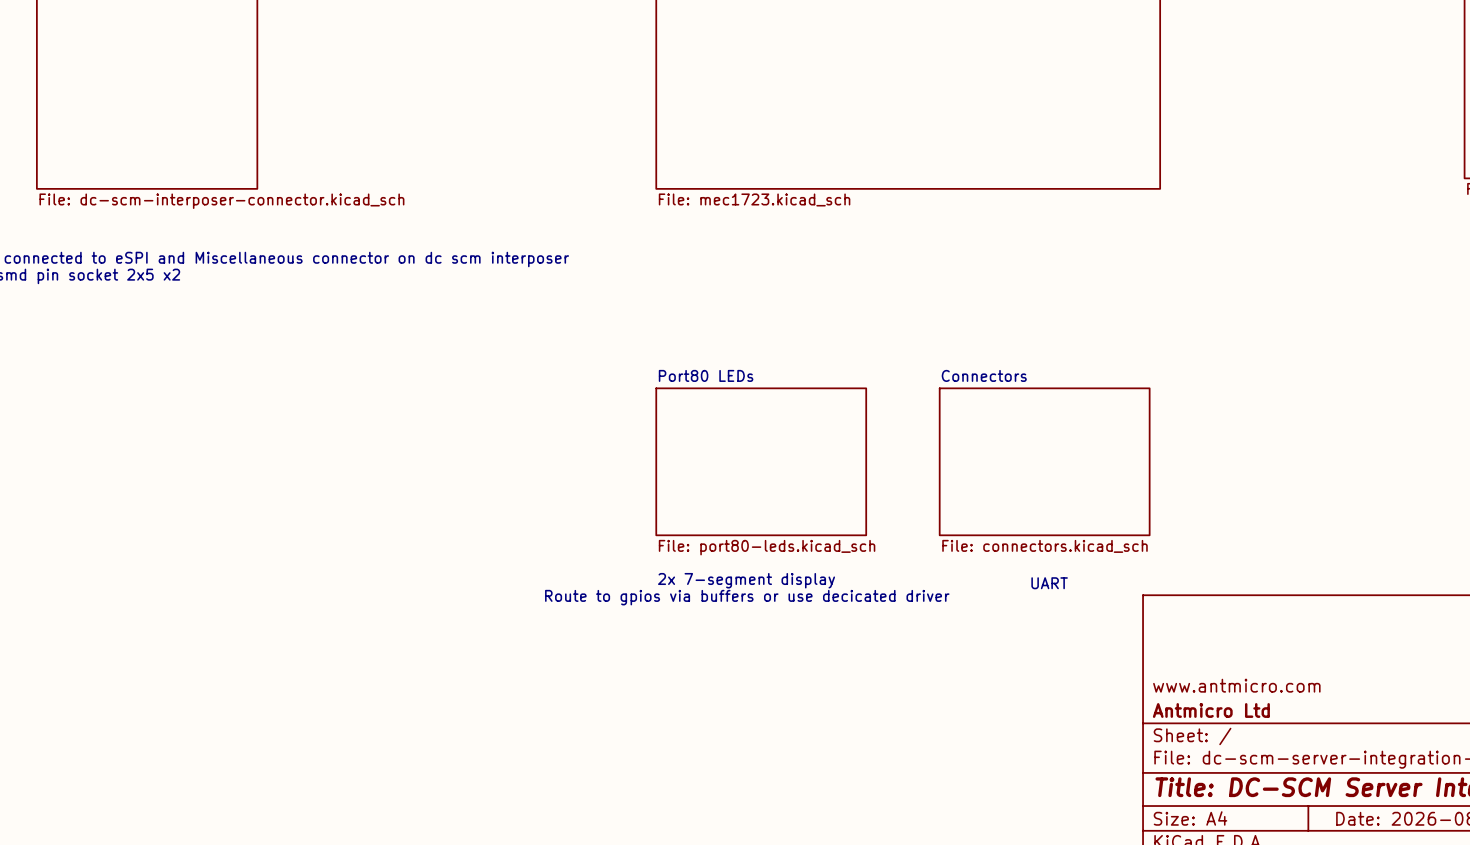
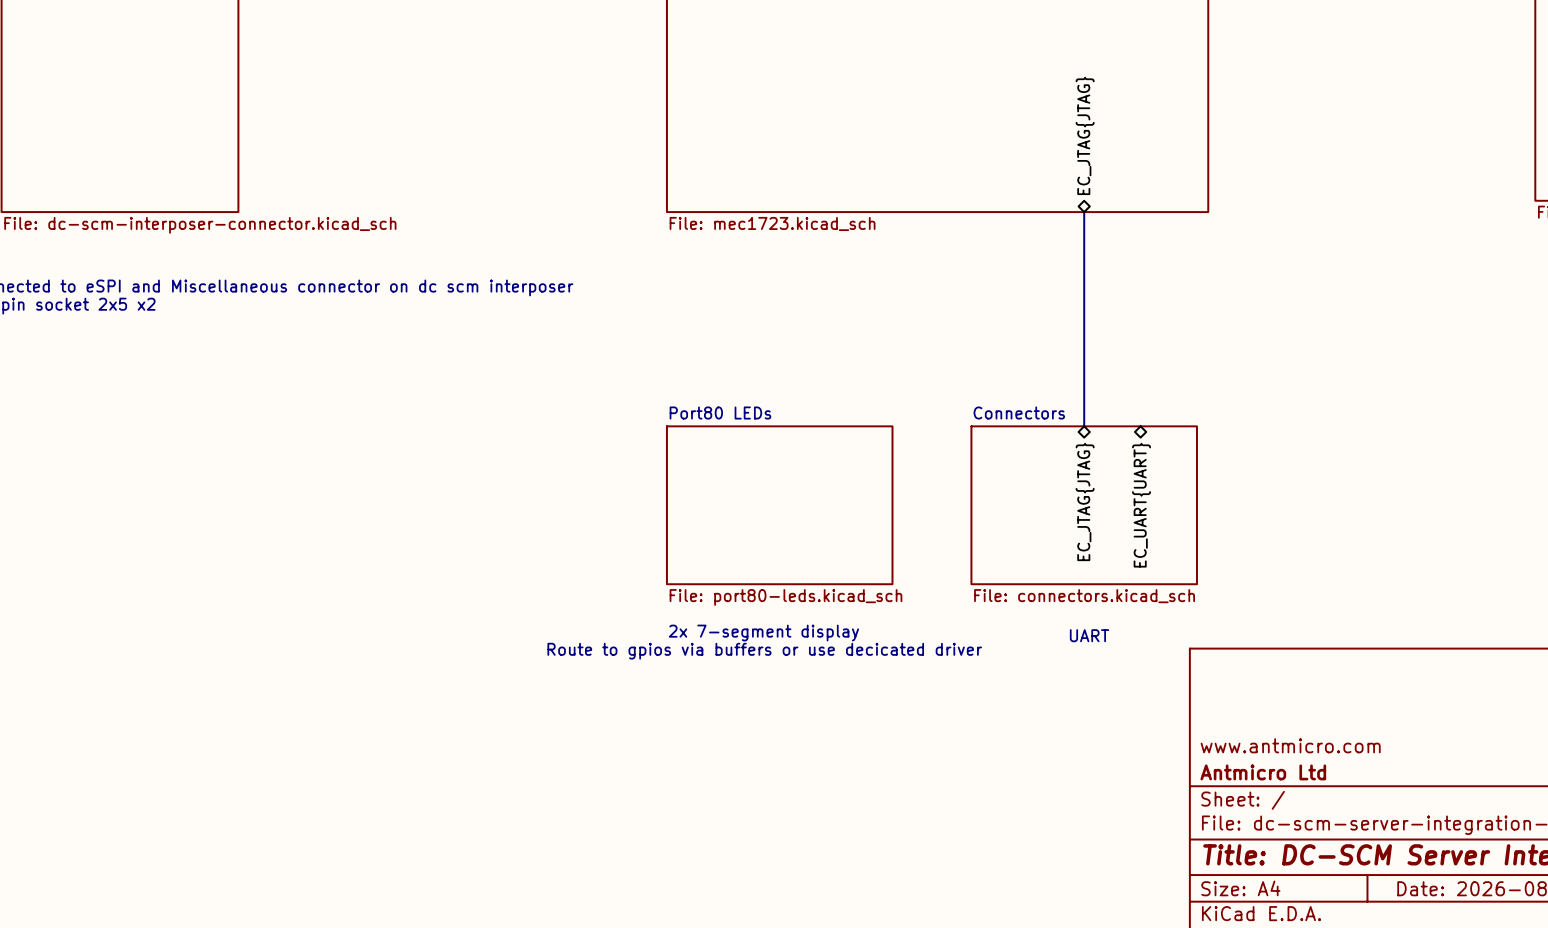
sheet pin: none -> EC_JTAG{JTAG} (1085, 135)
bus: none -> (1084, 212) (1084, 426)
sheet pin: none -> EC_JTAG{JTAG} (1085, 501)
sheet pin: none -> EC_UART{UART} (1141, 505)

